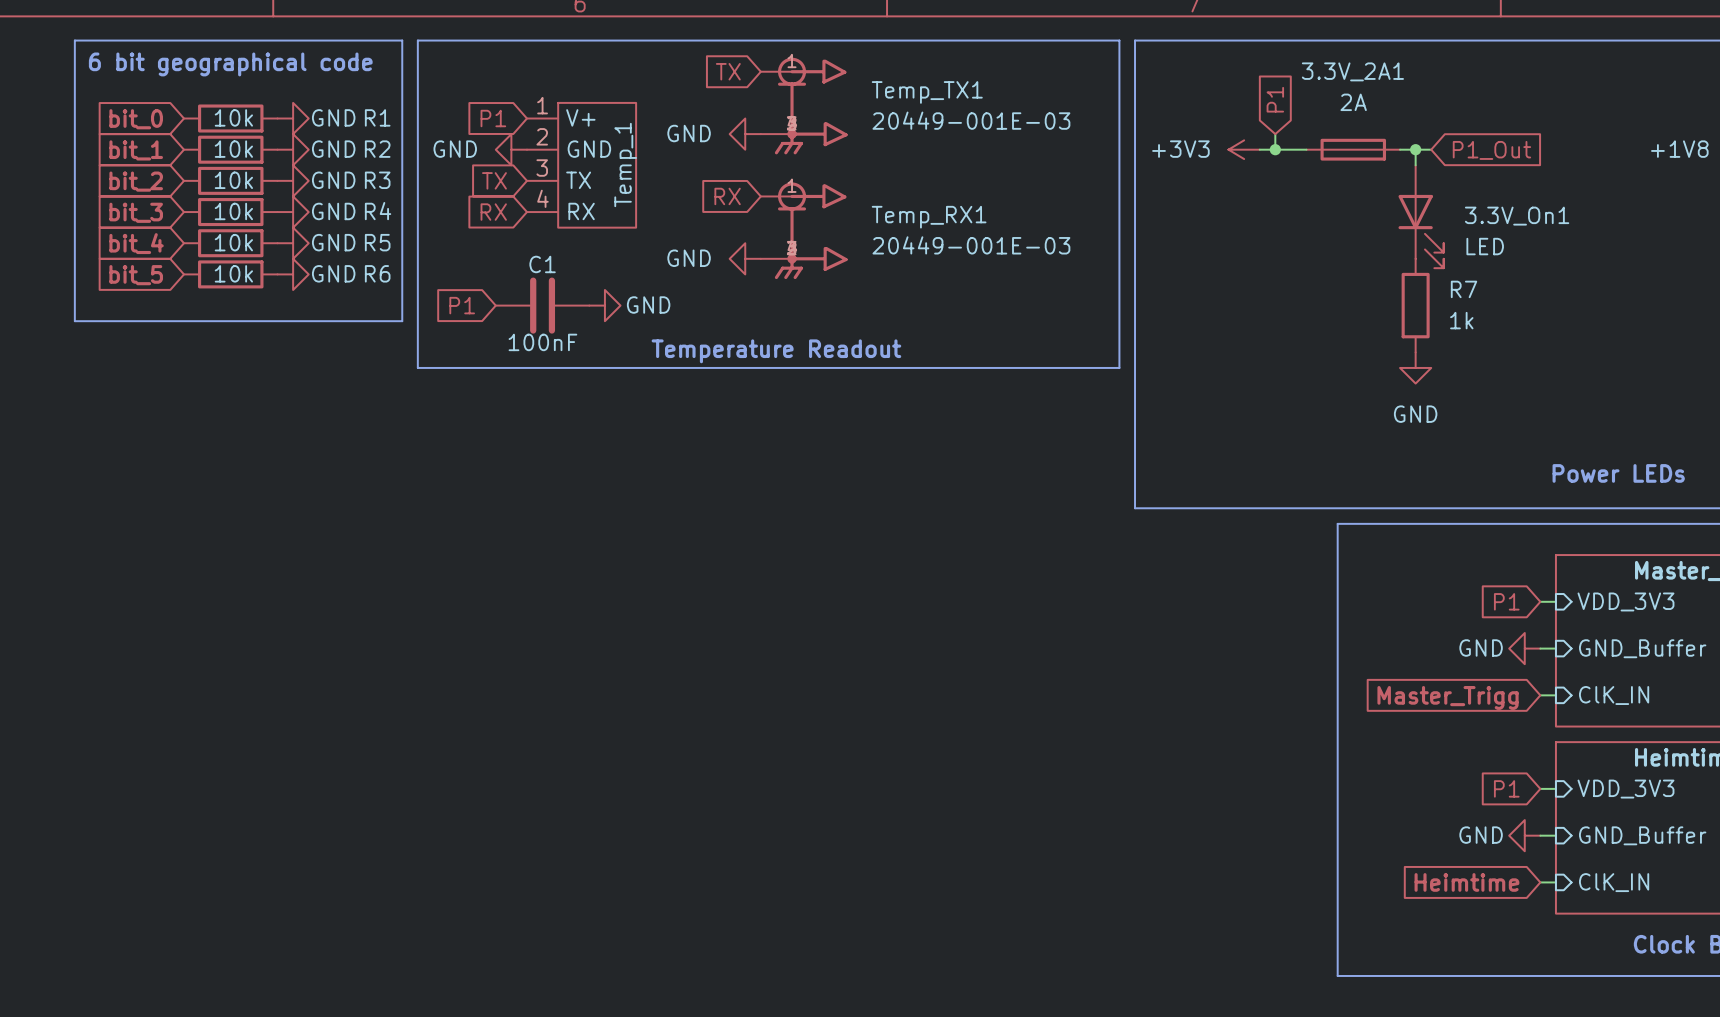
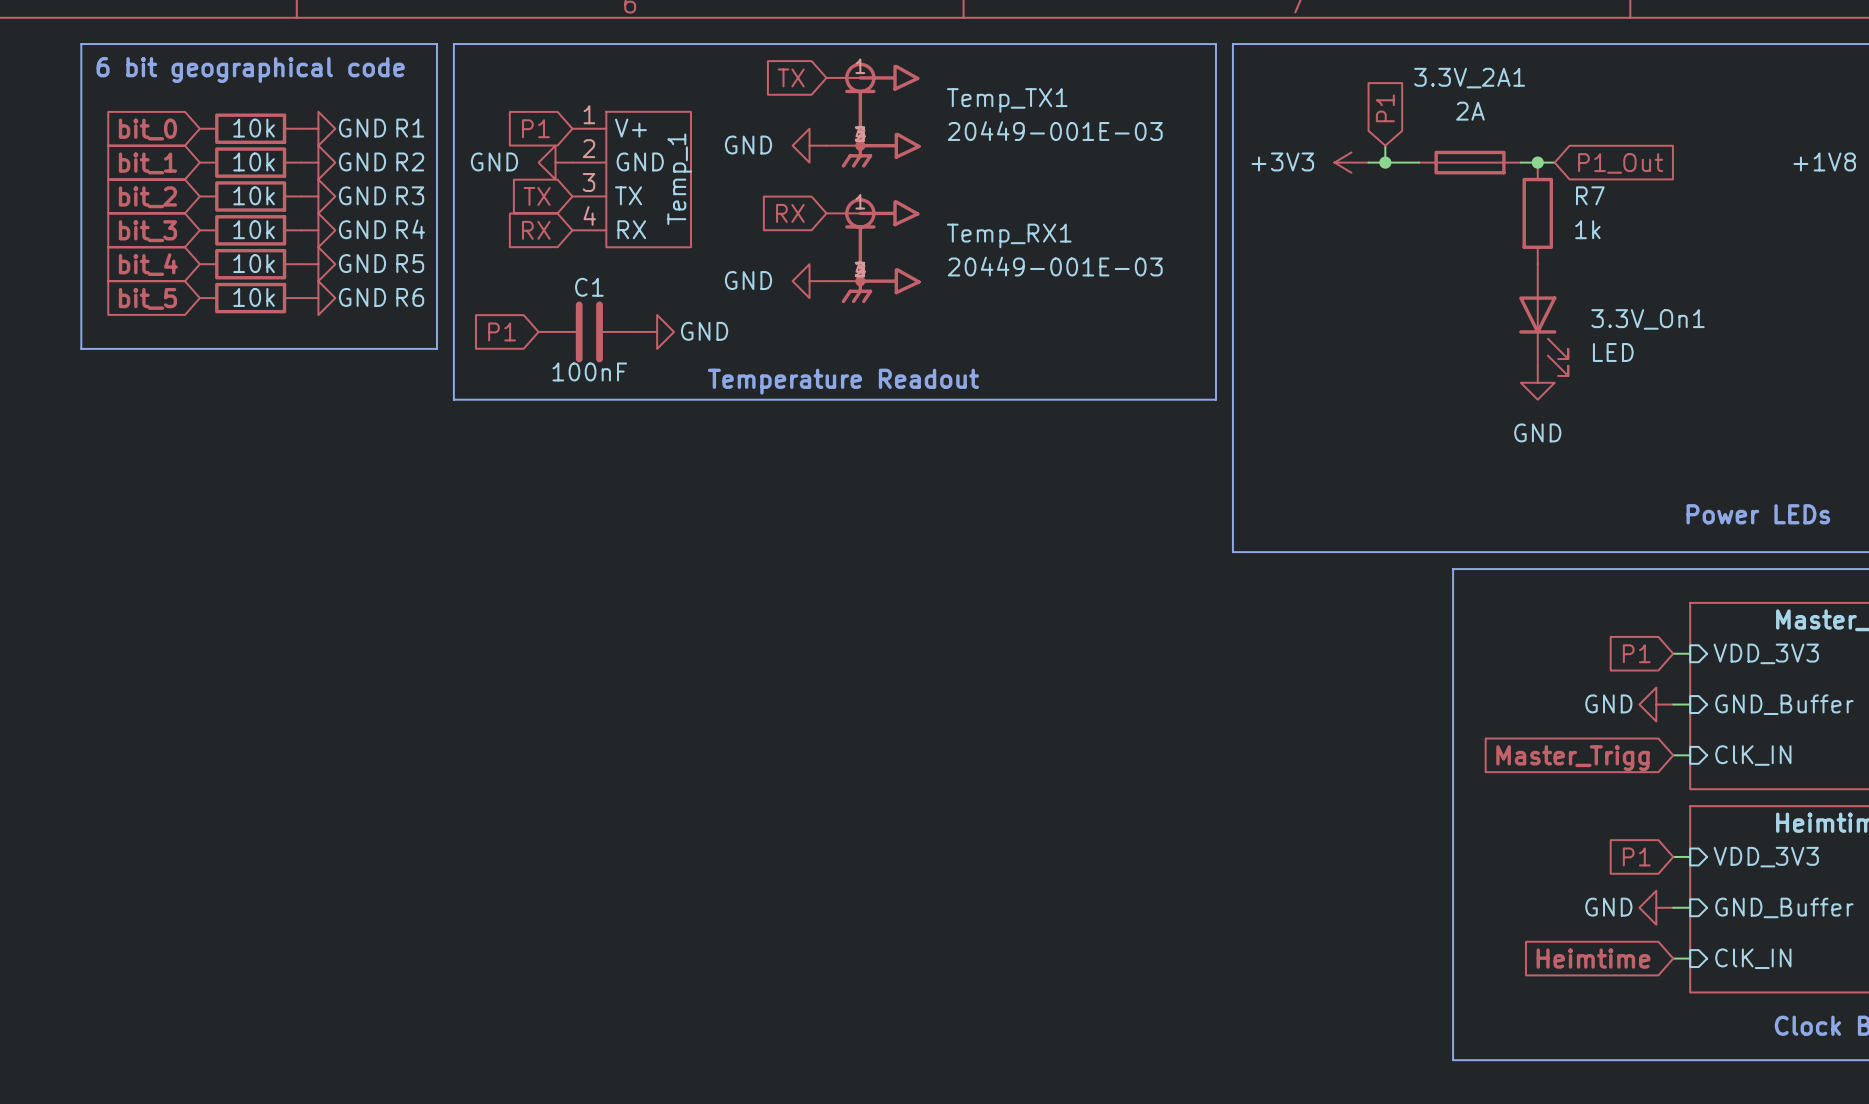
3.3V_On1 position: (1421, 216) -> (1543, 320)
R7 position: (1415, 305) -> (1537, 213)
power symbol position: GND (1415, 367) -> GND (1537, 382)

